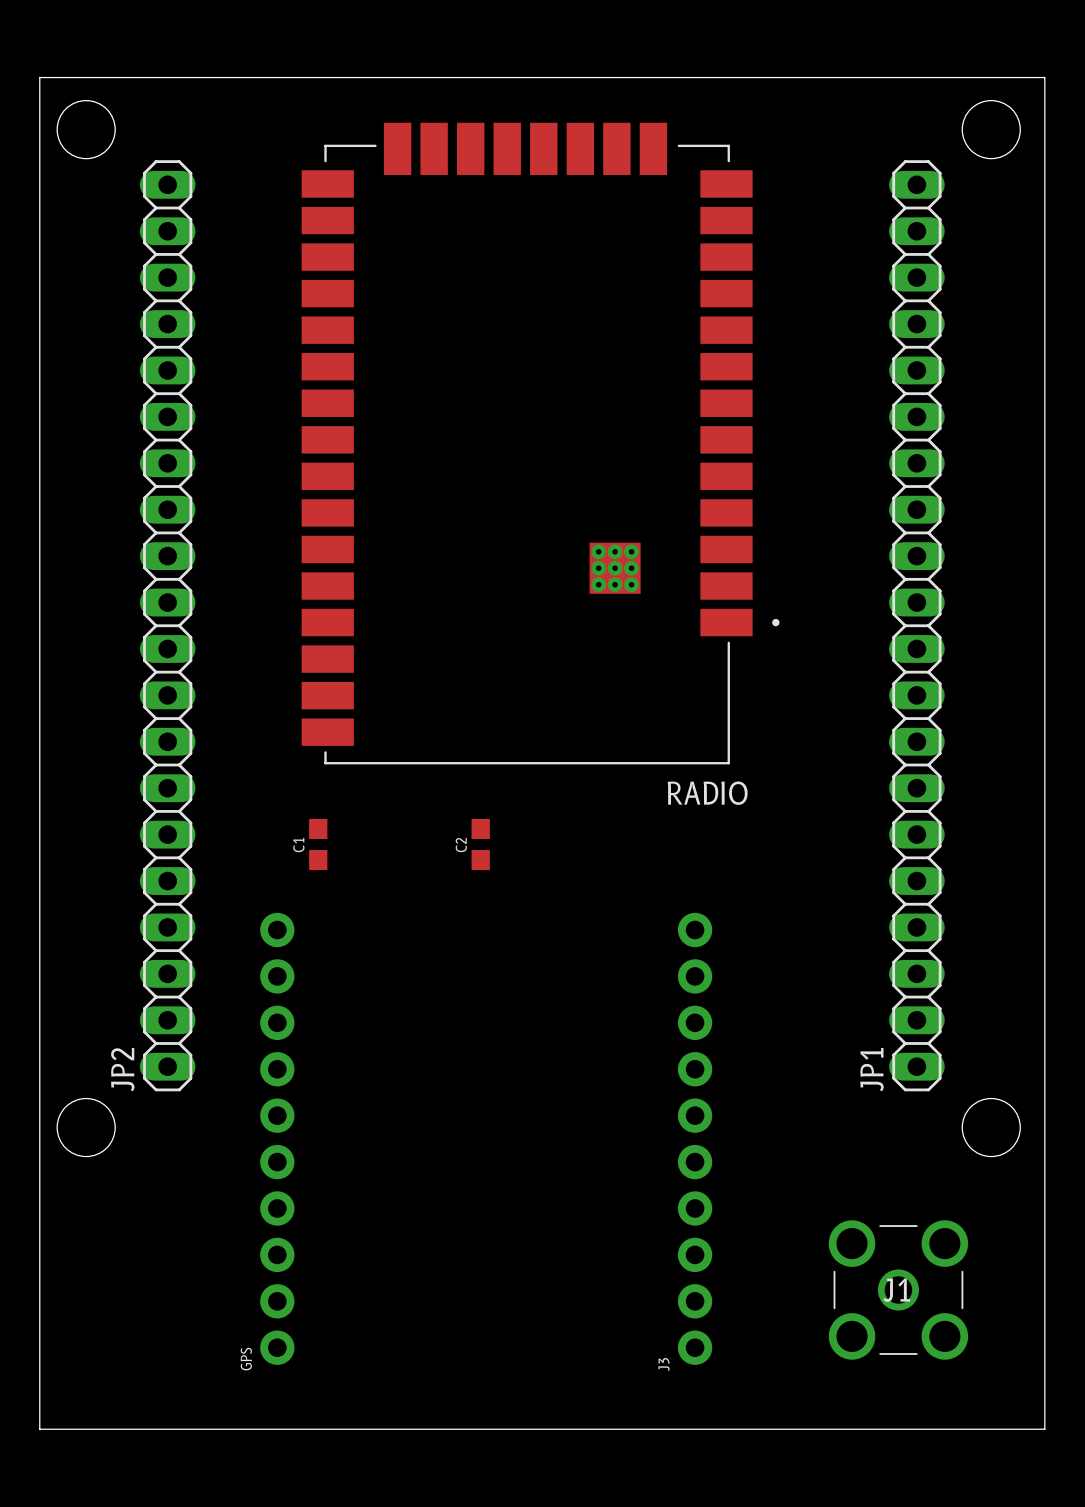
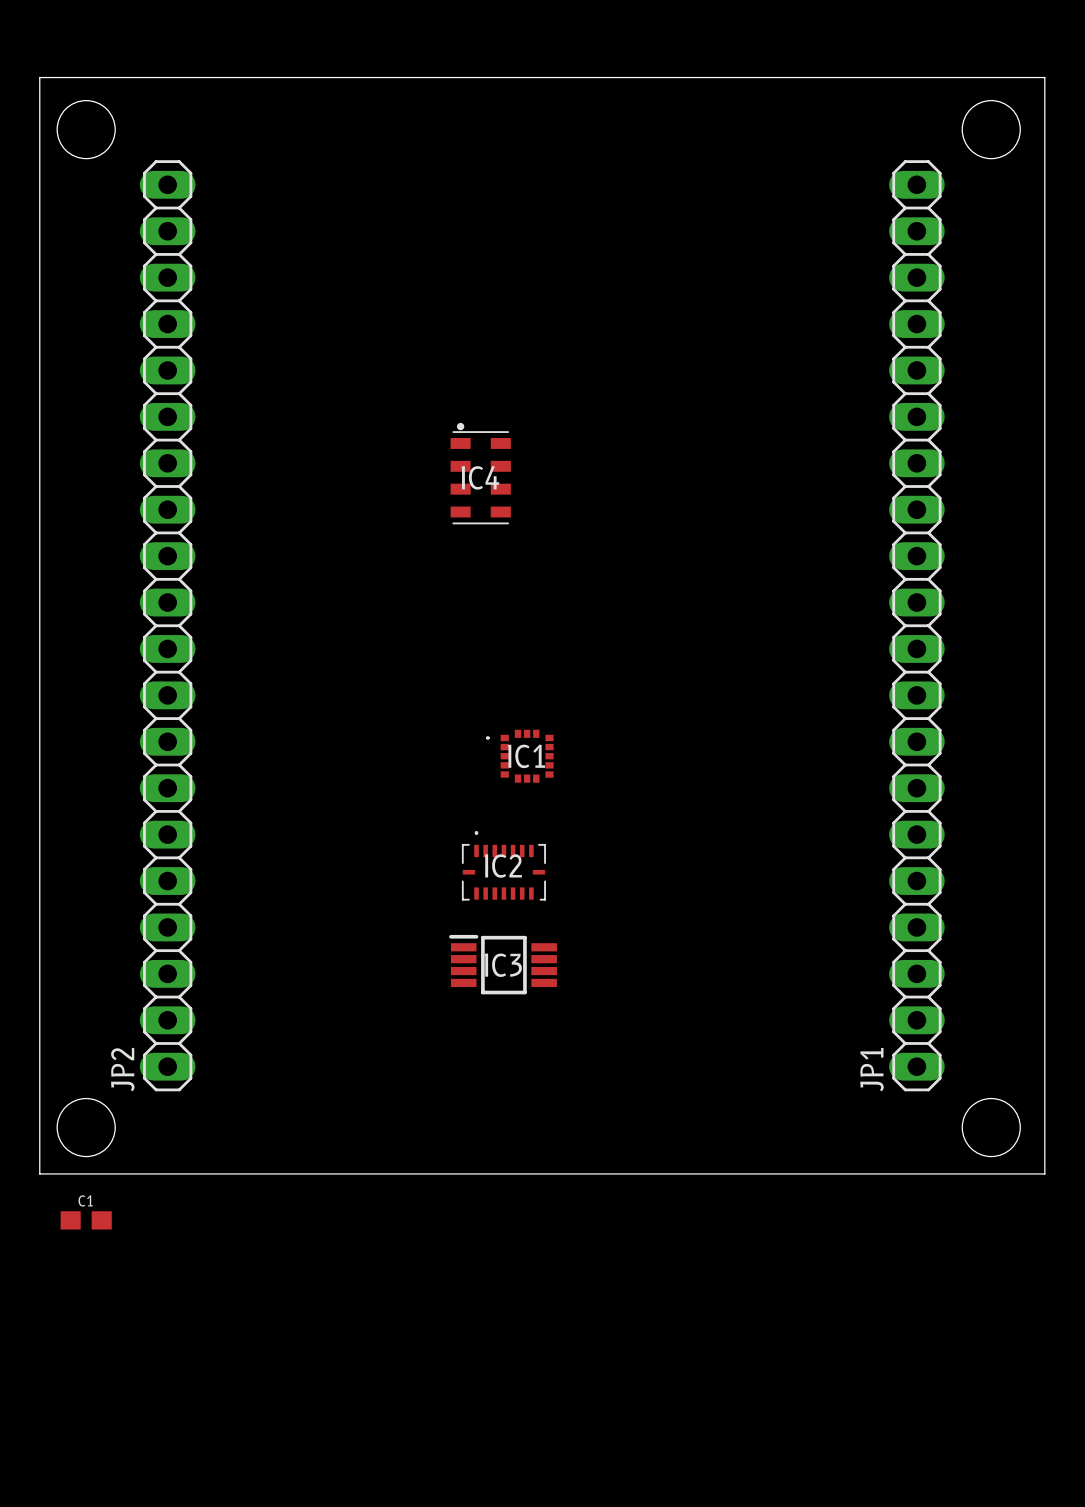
RADIO: (540, 443) -> none
IC4: none -> (480, 473)
IC1: none -> (519, 756)
C1 rotation: 0° (318, 844) -> 90° clockwise (86, 1220)
C1 position: (318, 844) -> (86, 1220)
C2: (480, 844) -> none
IC2: none -> (503, 865)
IC3: none -> (503, 964)
GPS: (277, 1138) -> none
J3: (695, 1138) -> none
board edge: (39, 1173) (39, 1429) (1044, 1429) (1044, 1173) -> (39, 1173) (1044, 1173)
J1: (898, 1289) -> none

